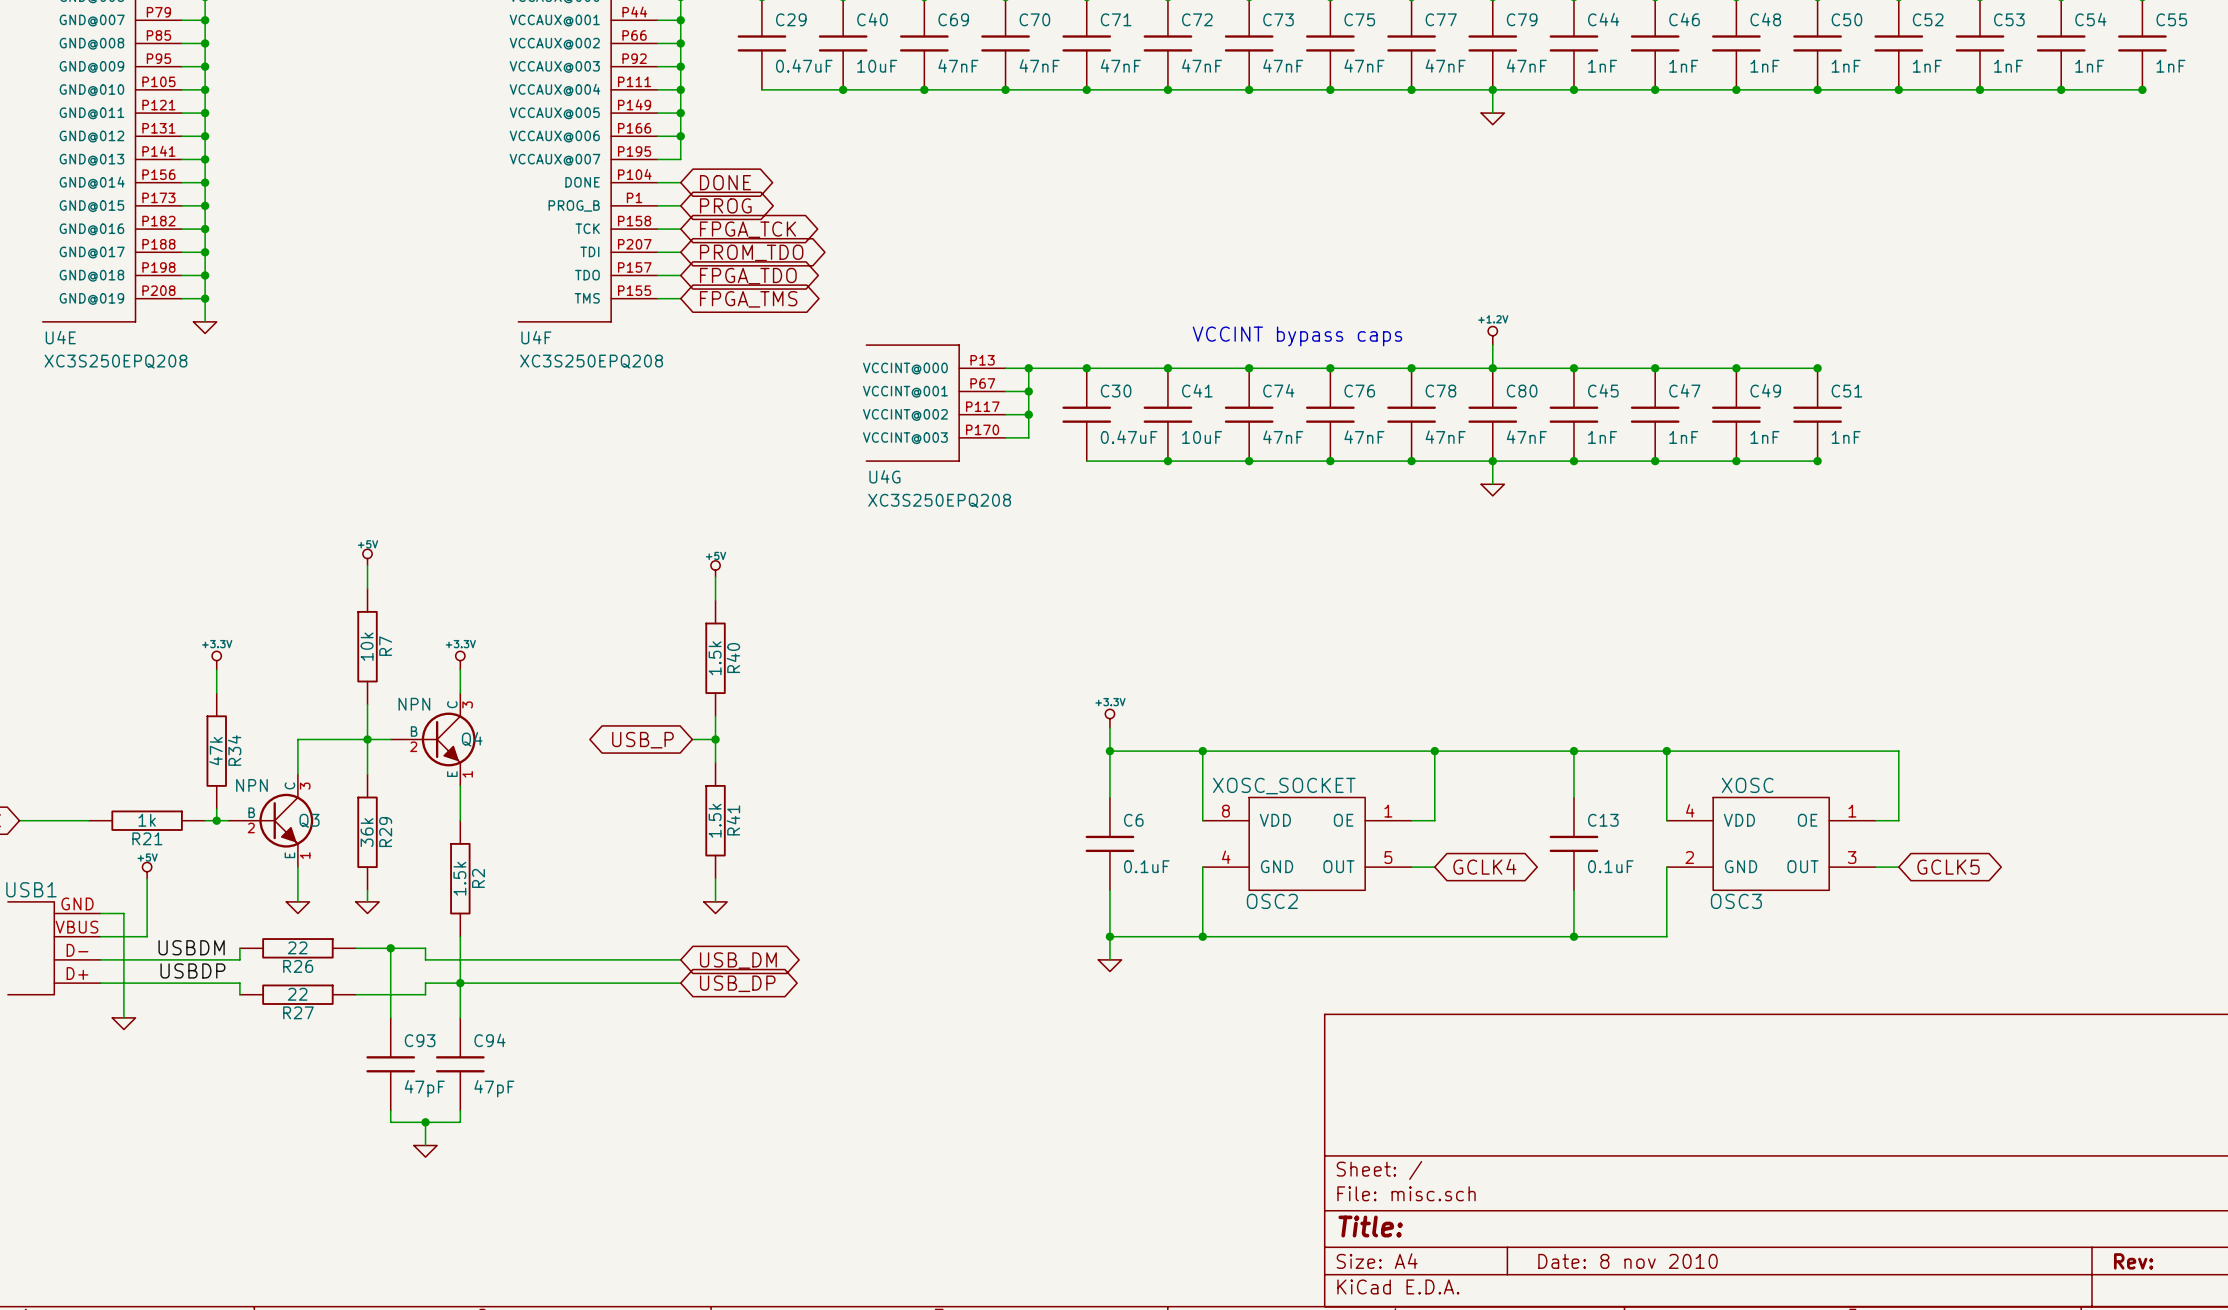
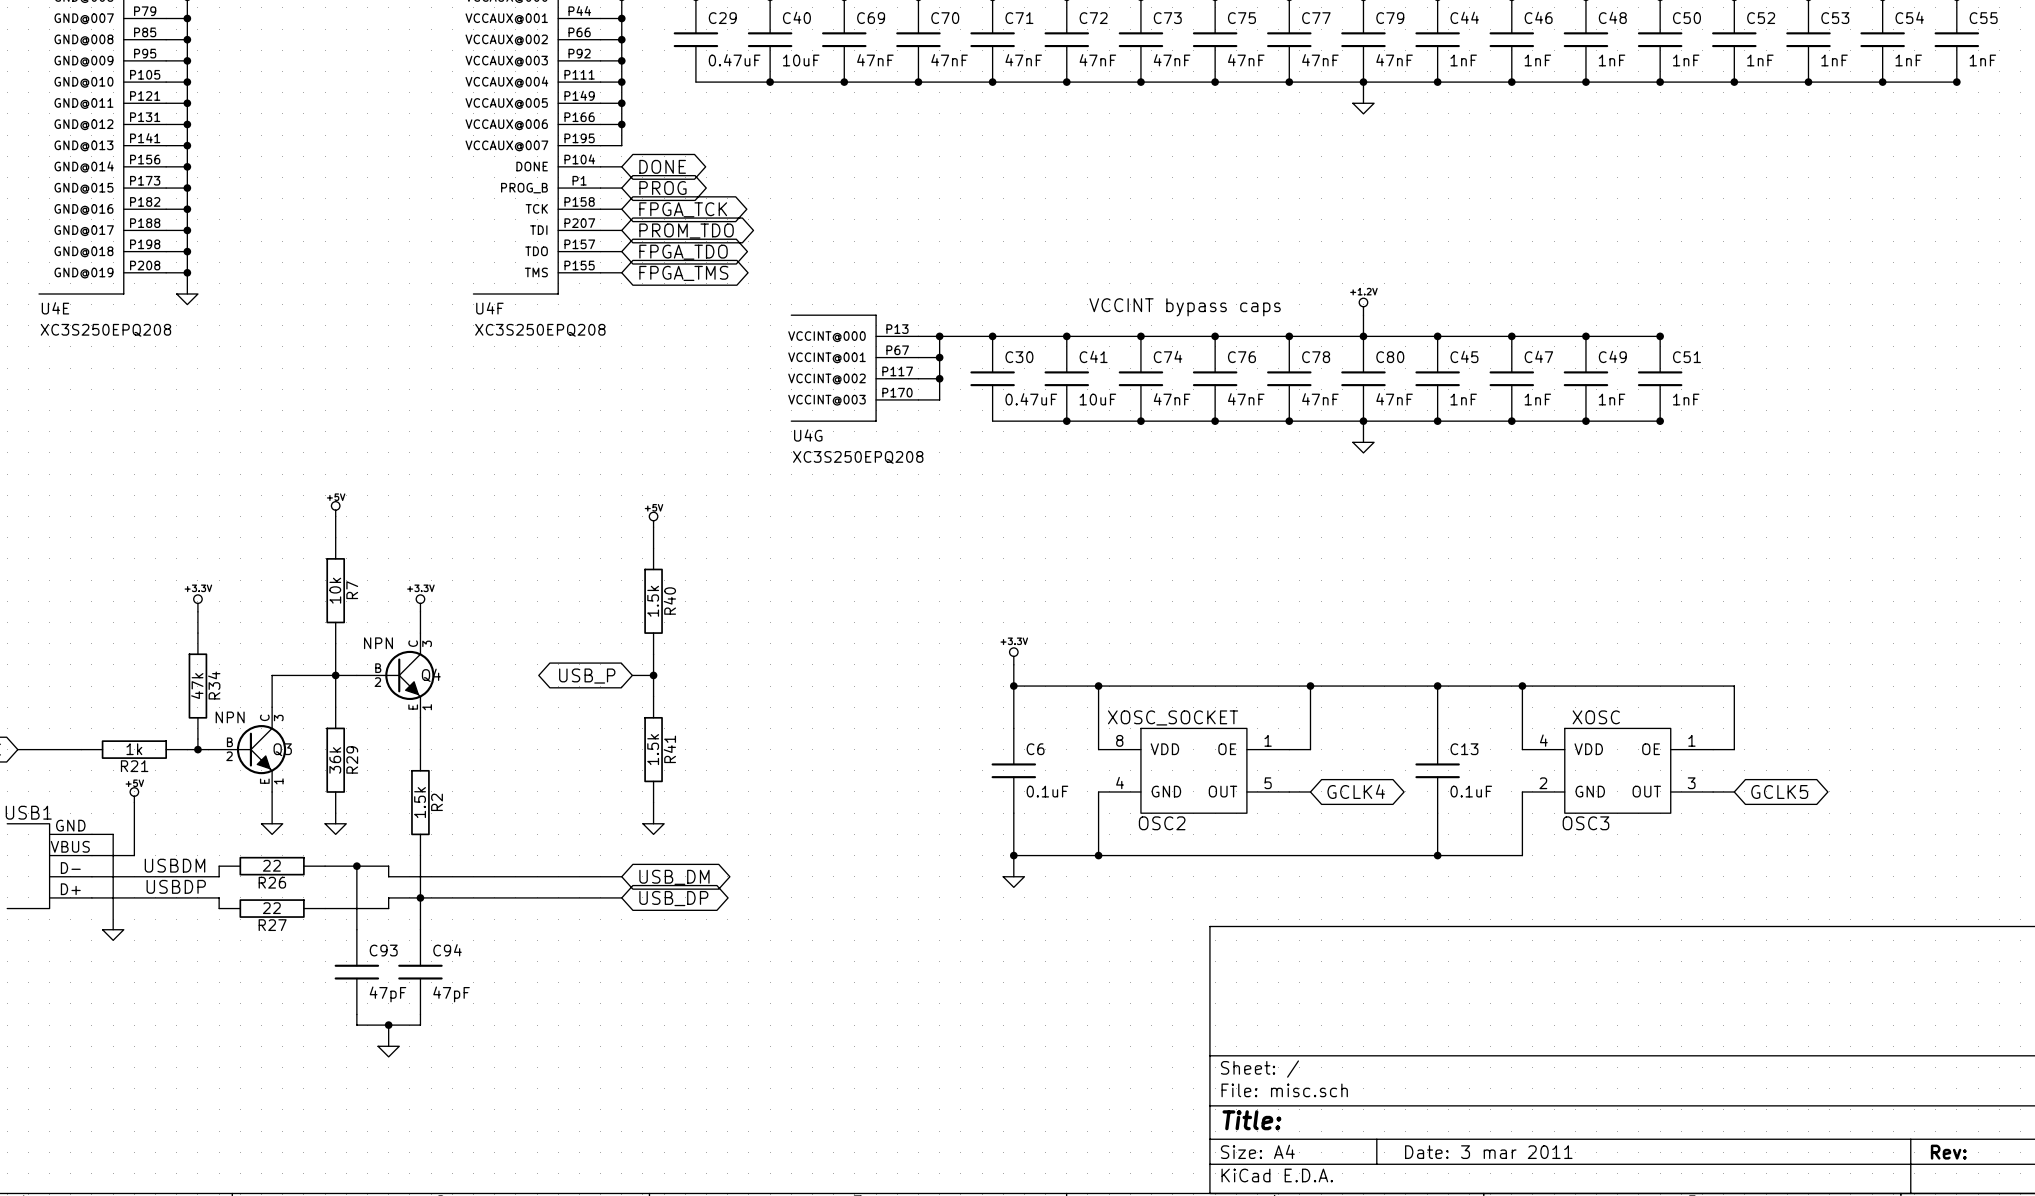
title block: Date: 8 nov 2010 (1628, 1261) -> Date: 3 mar 2011 (1488, 1152)

